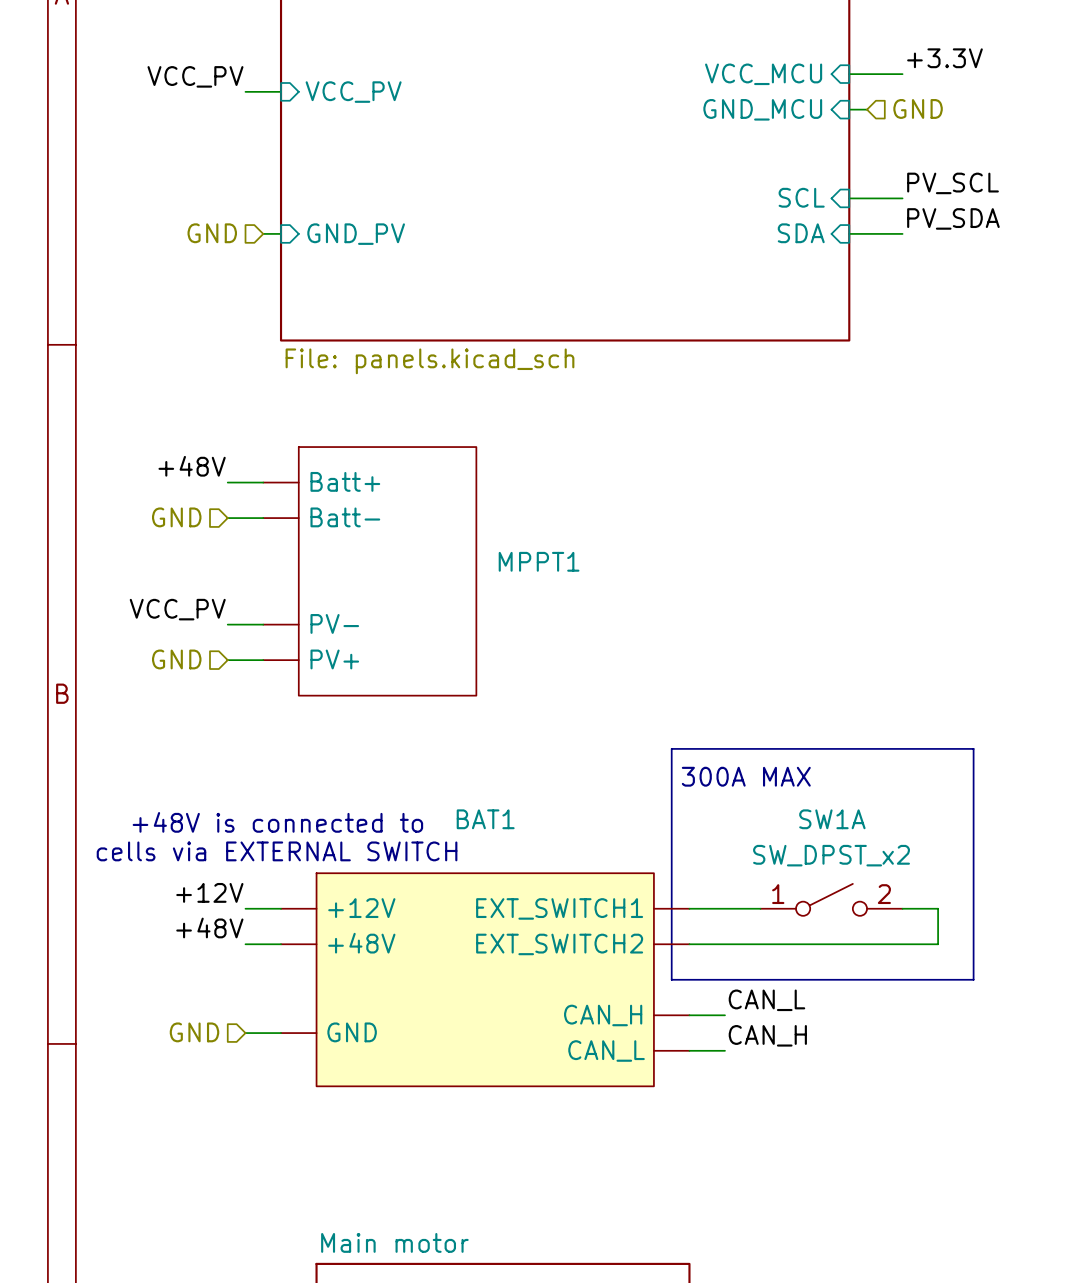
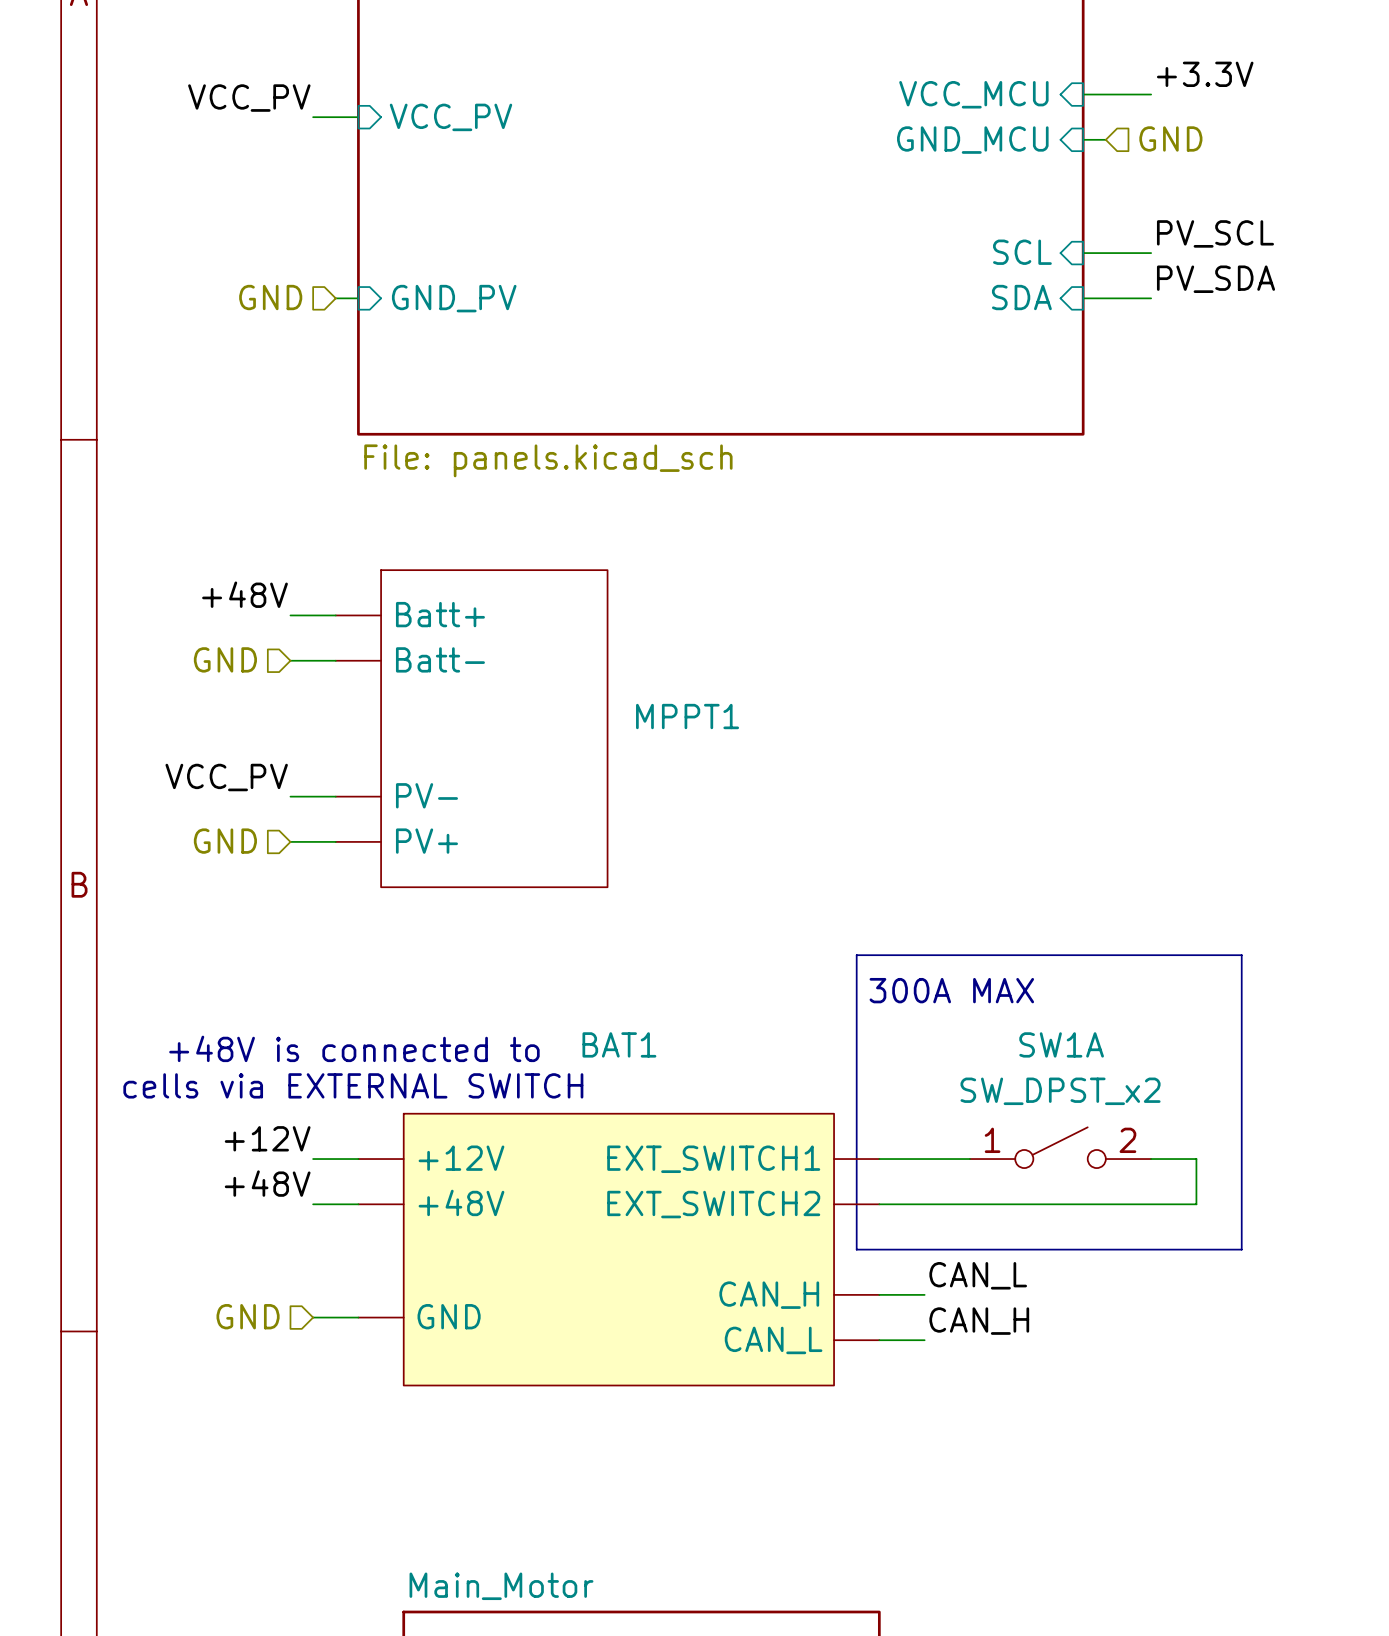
sheet Main motor name: Main motor (394, 1242) -> Main_Motor (501, 1586)

